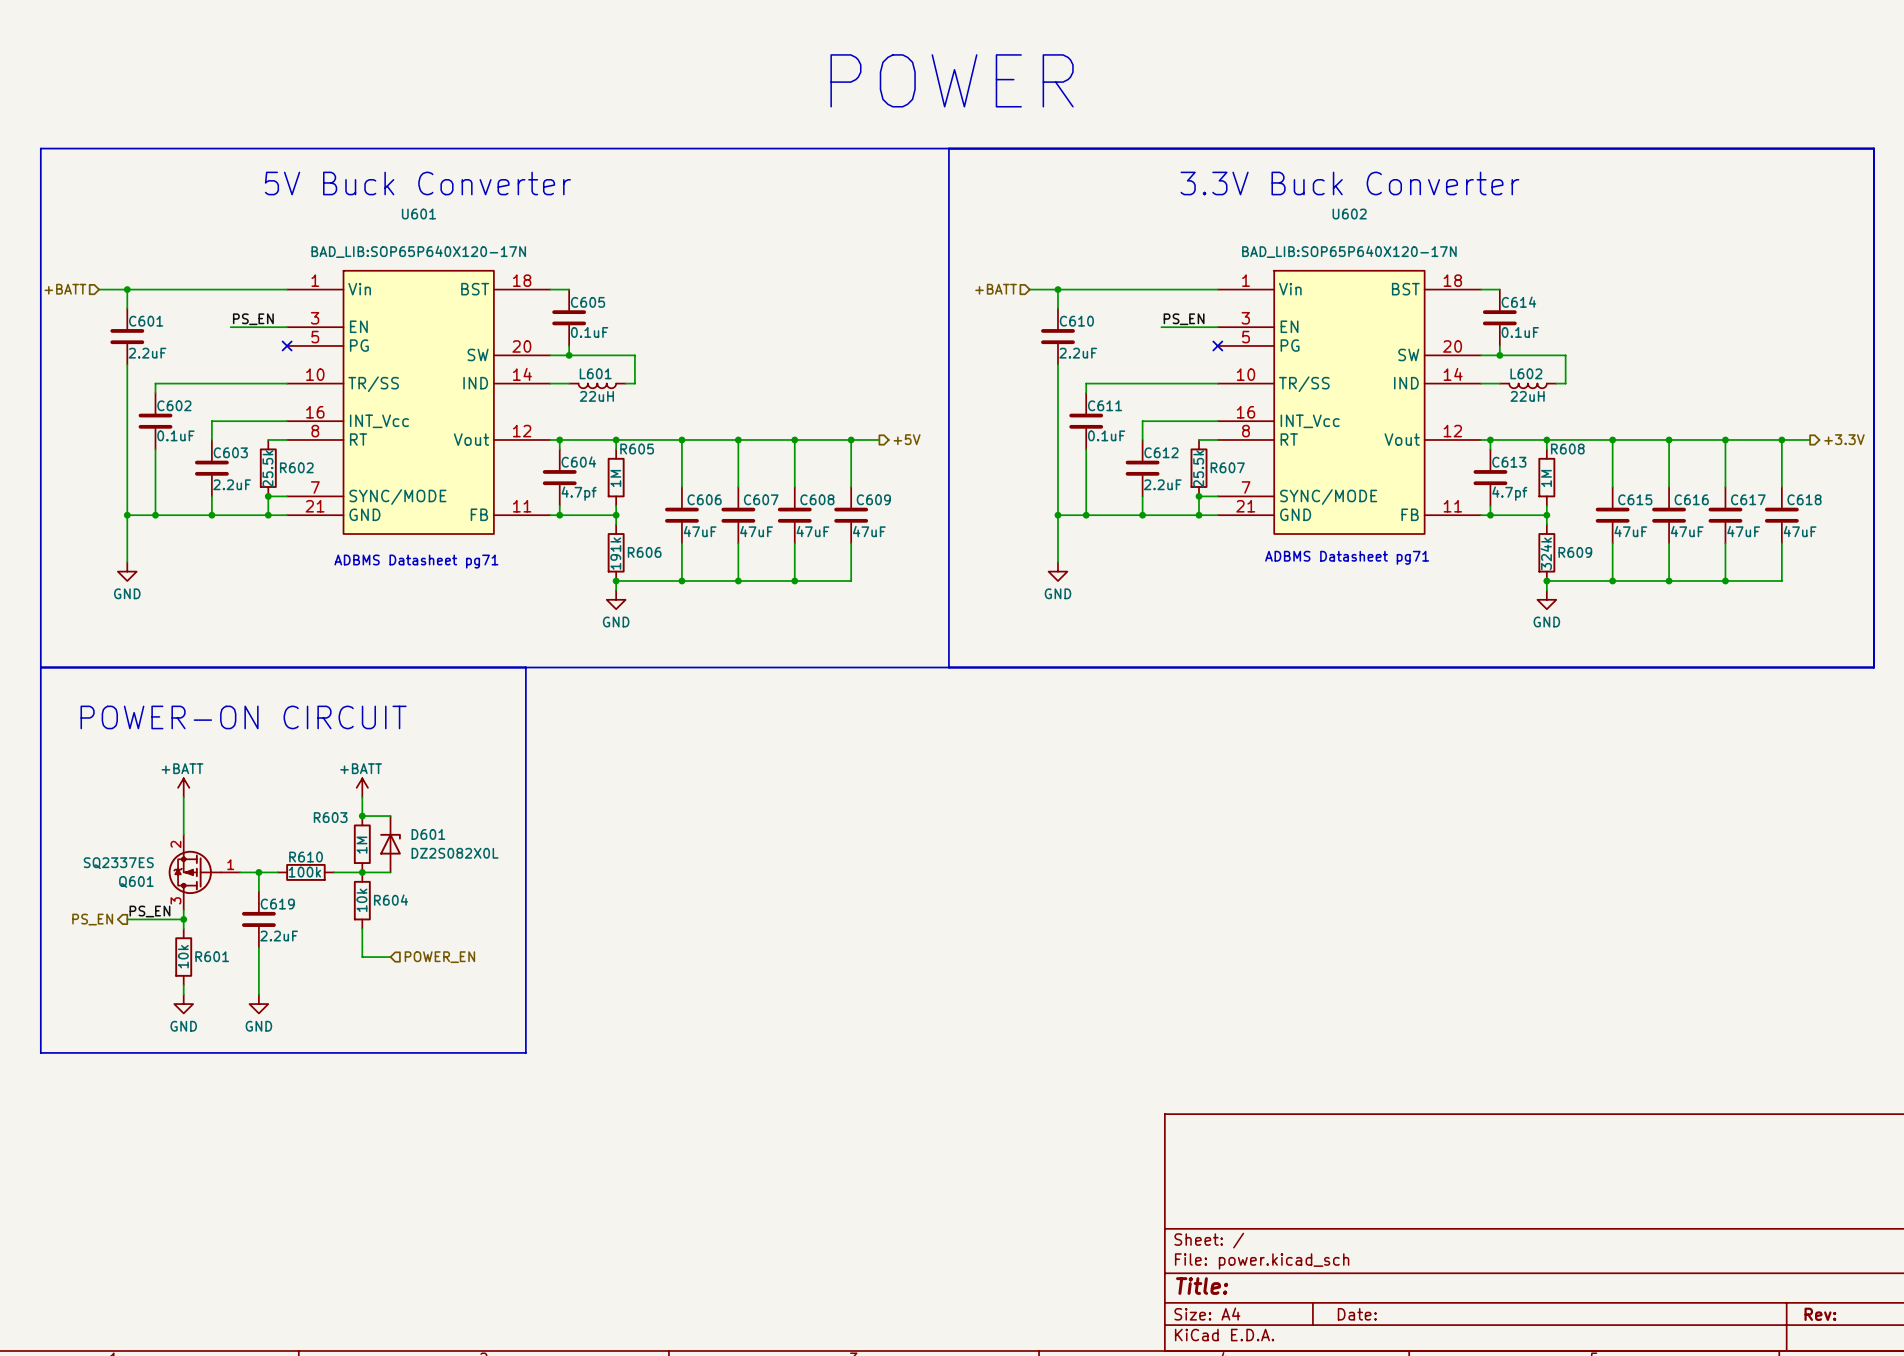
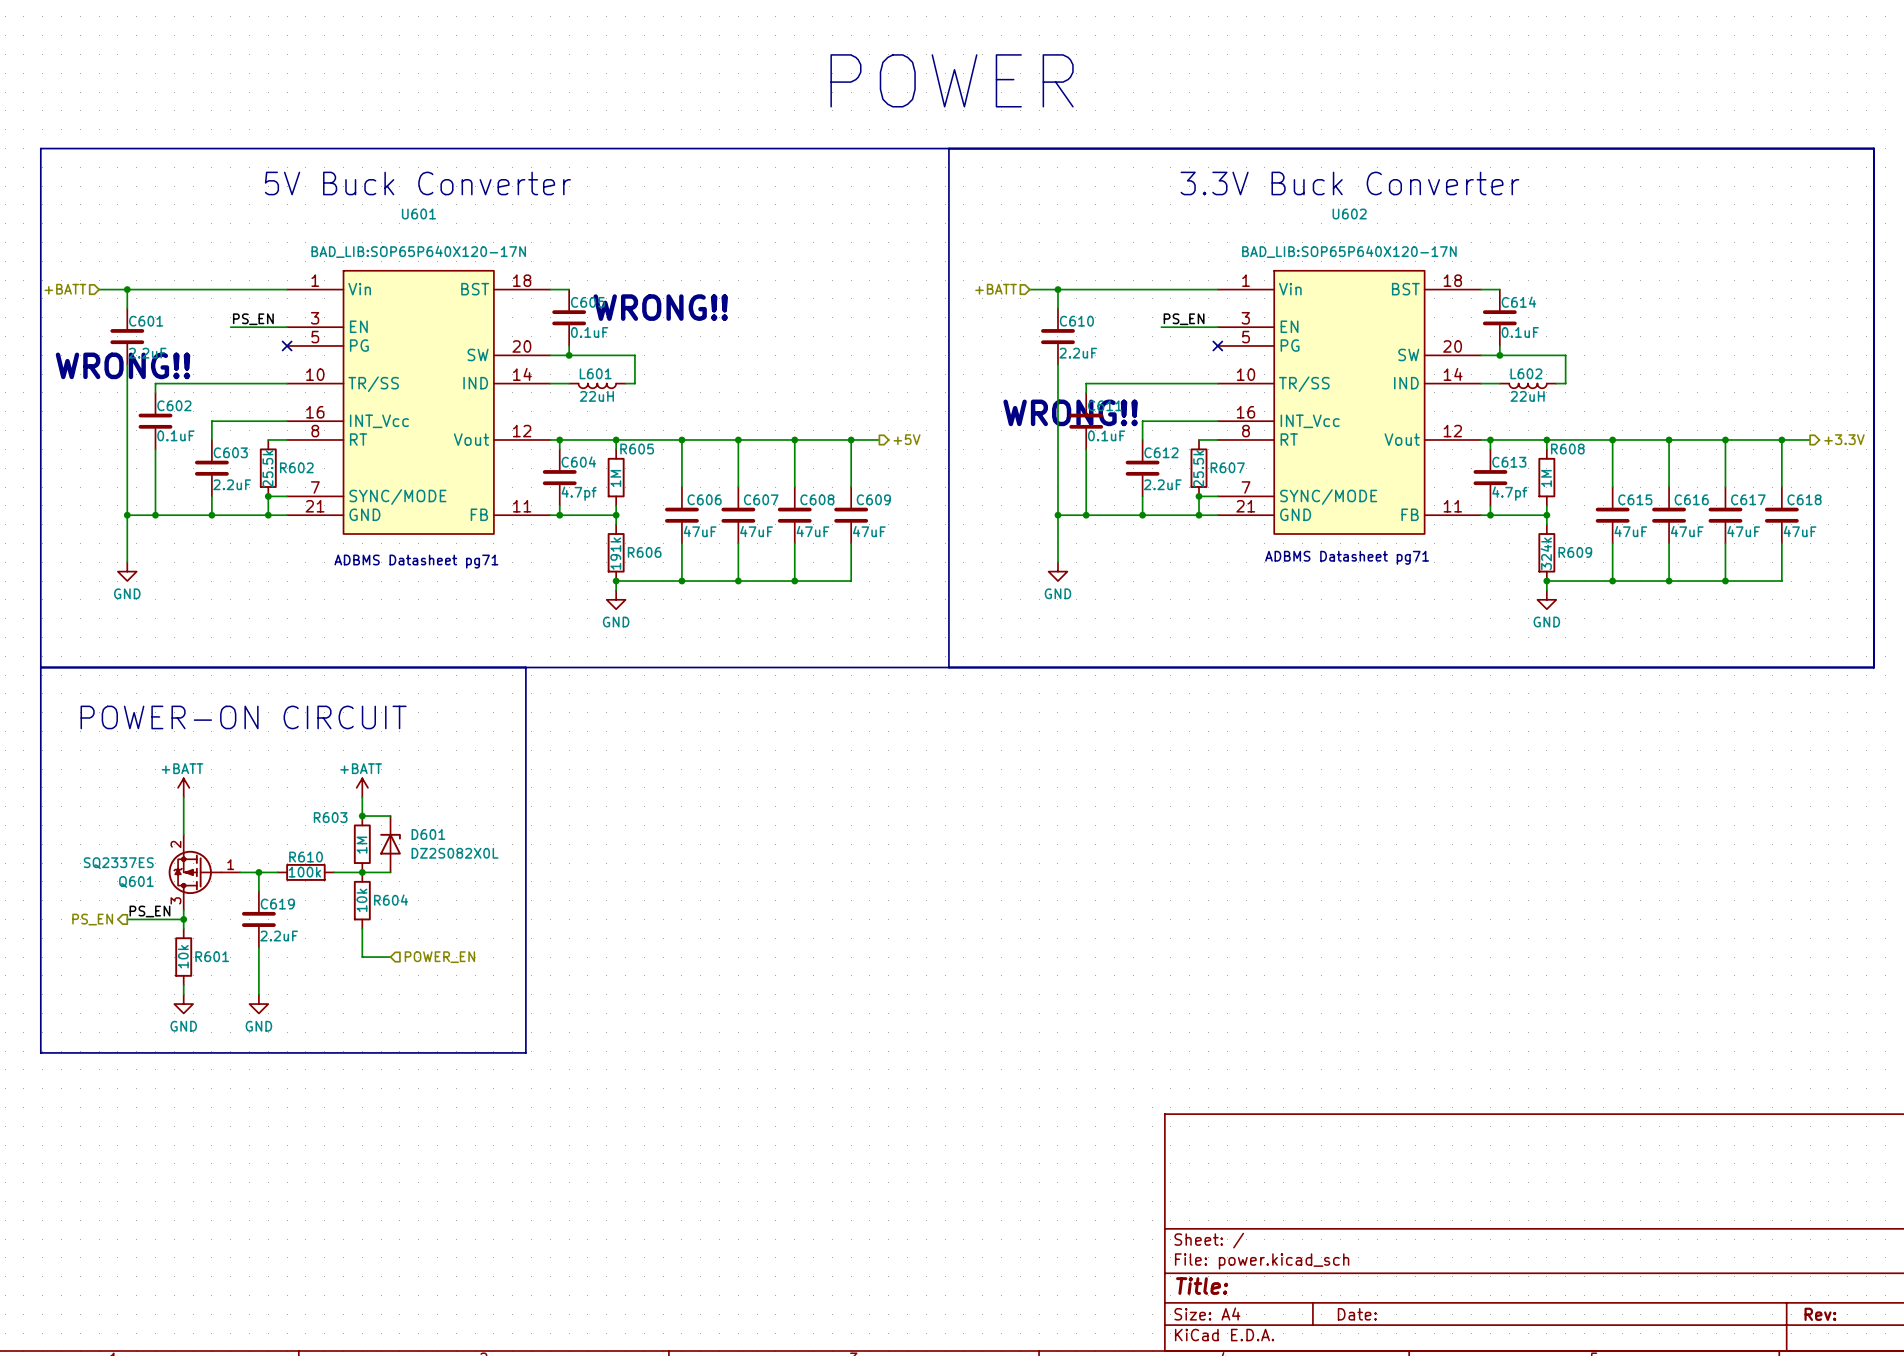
text: none -> WRONG!! (660, 307)
text: none -> WRONG!! (123, 365)
text: none -> WRONG!! (1070, 412)

